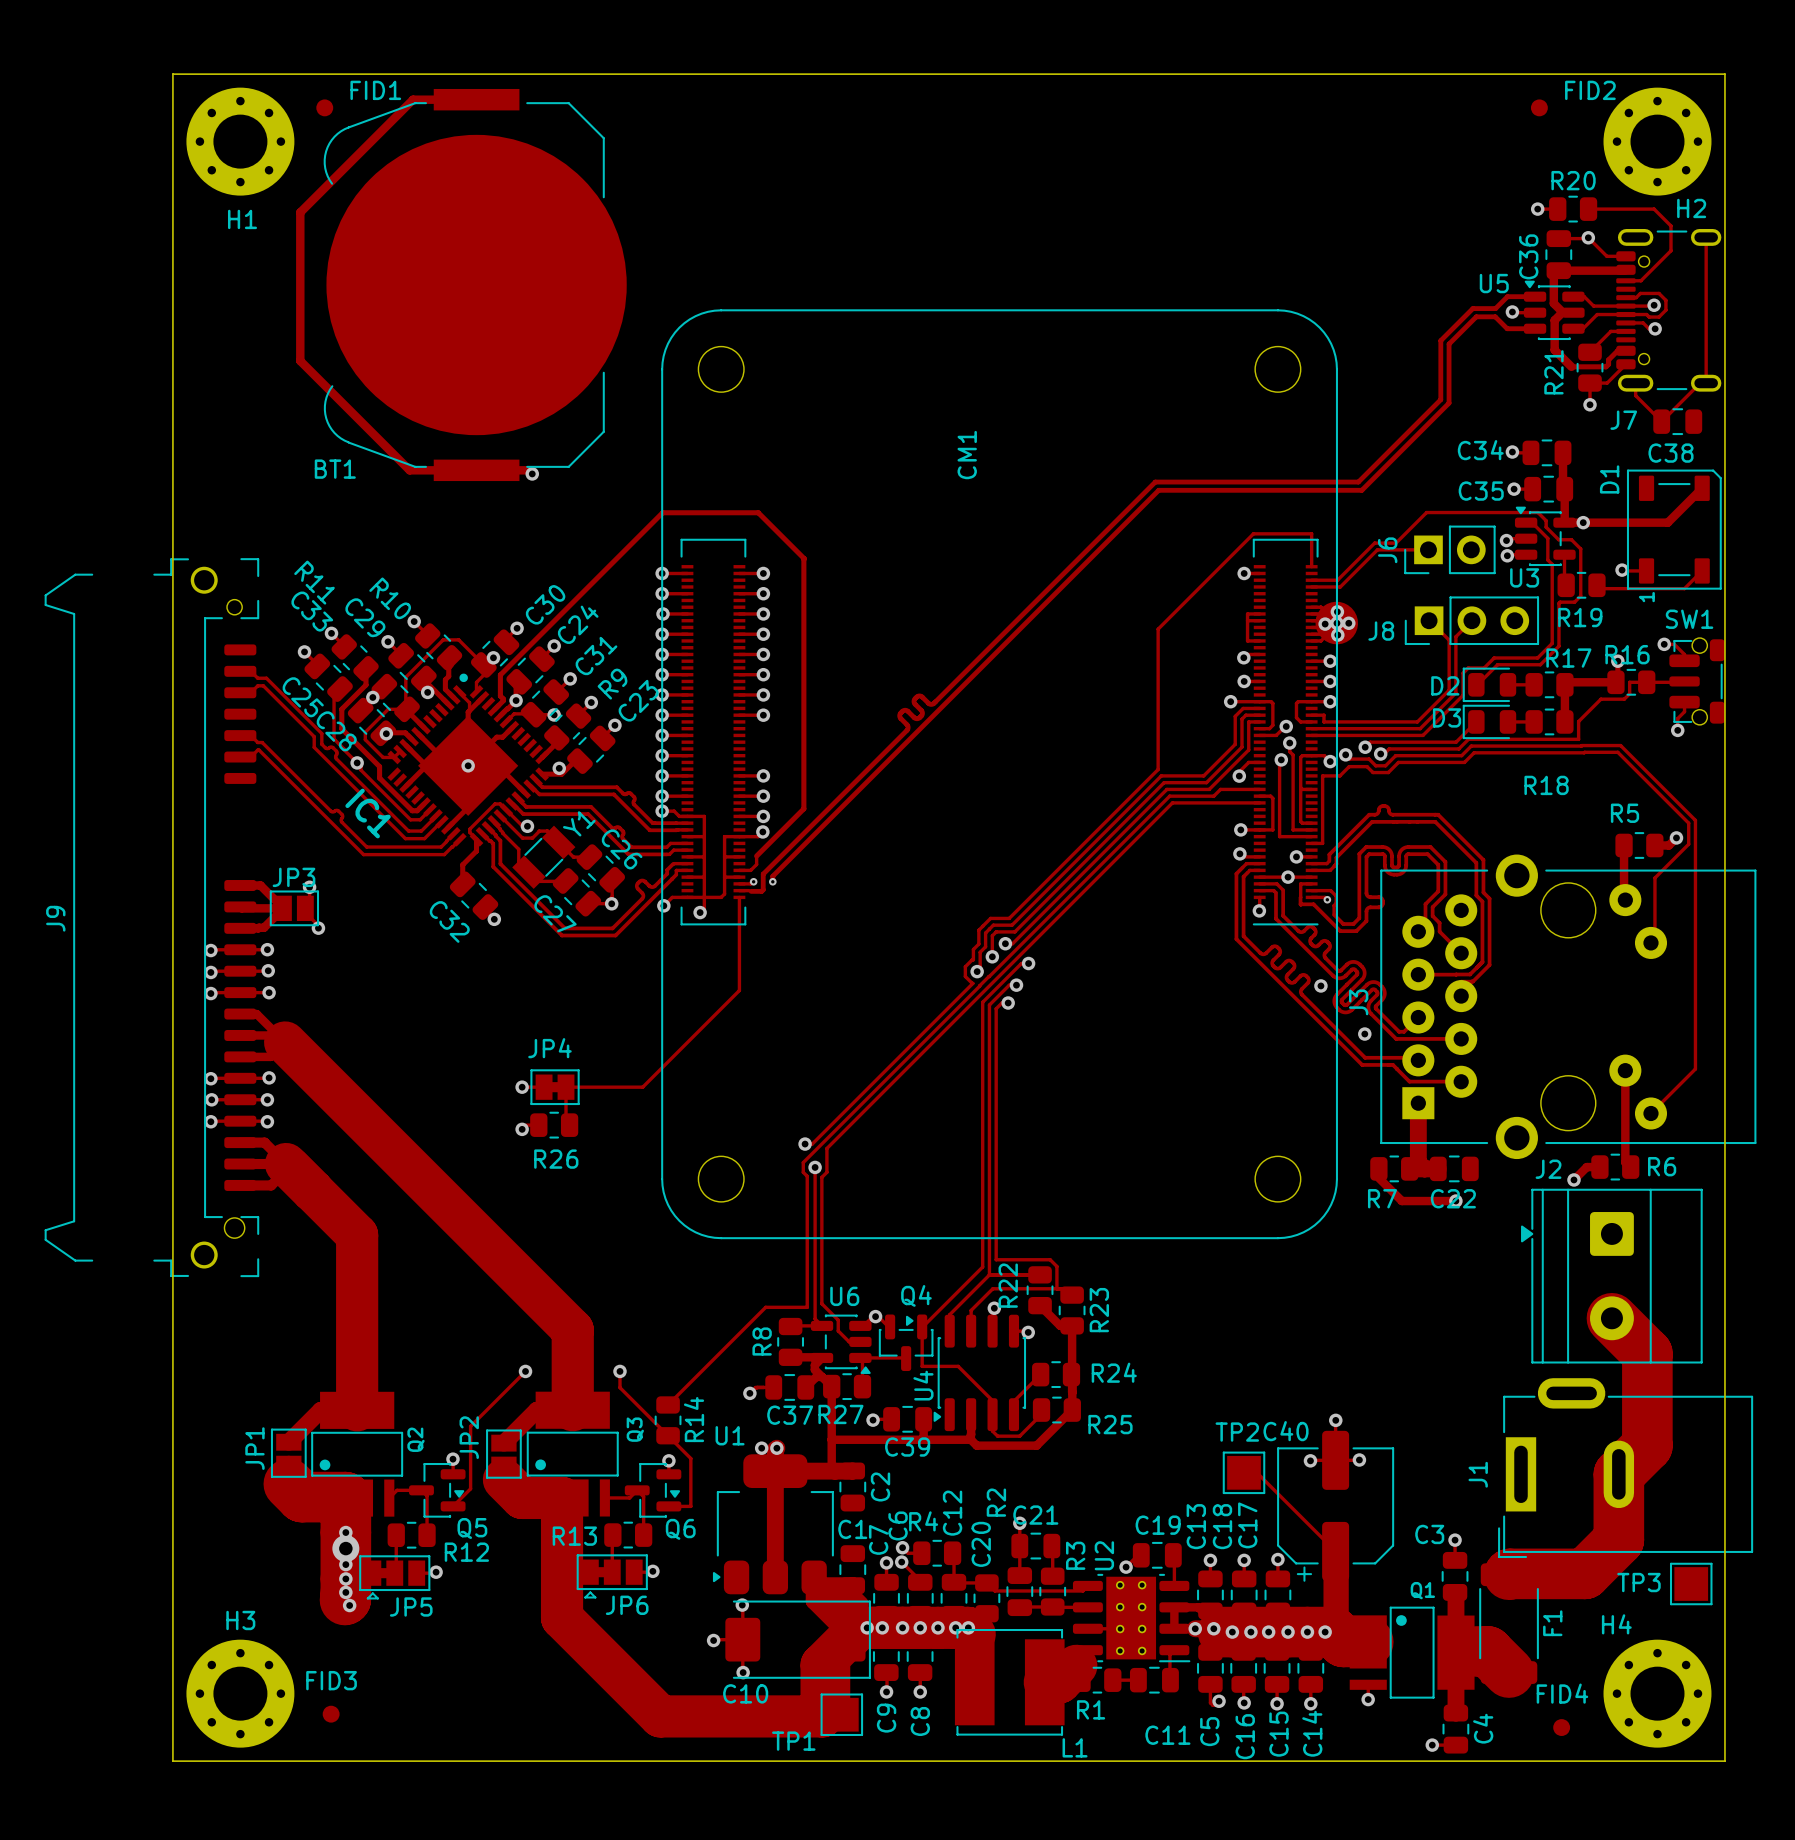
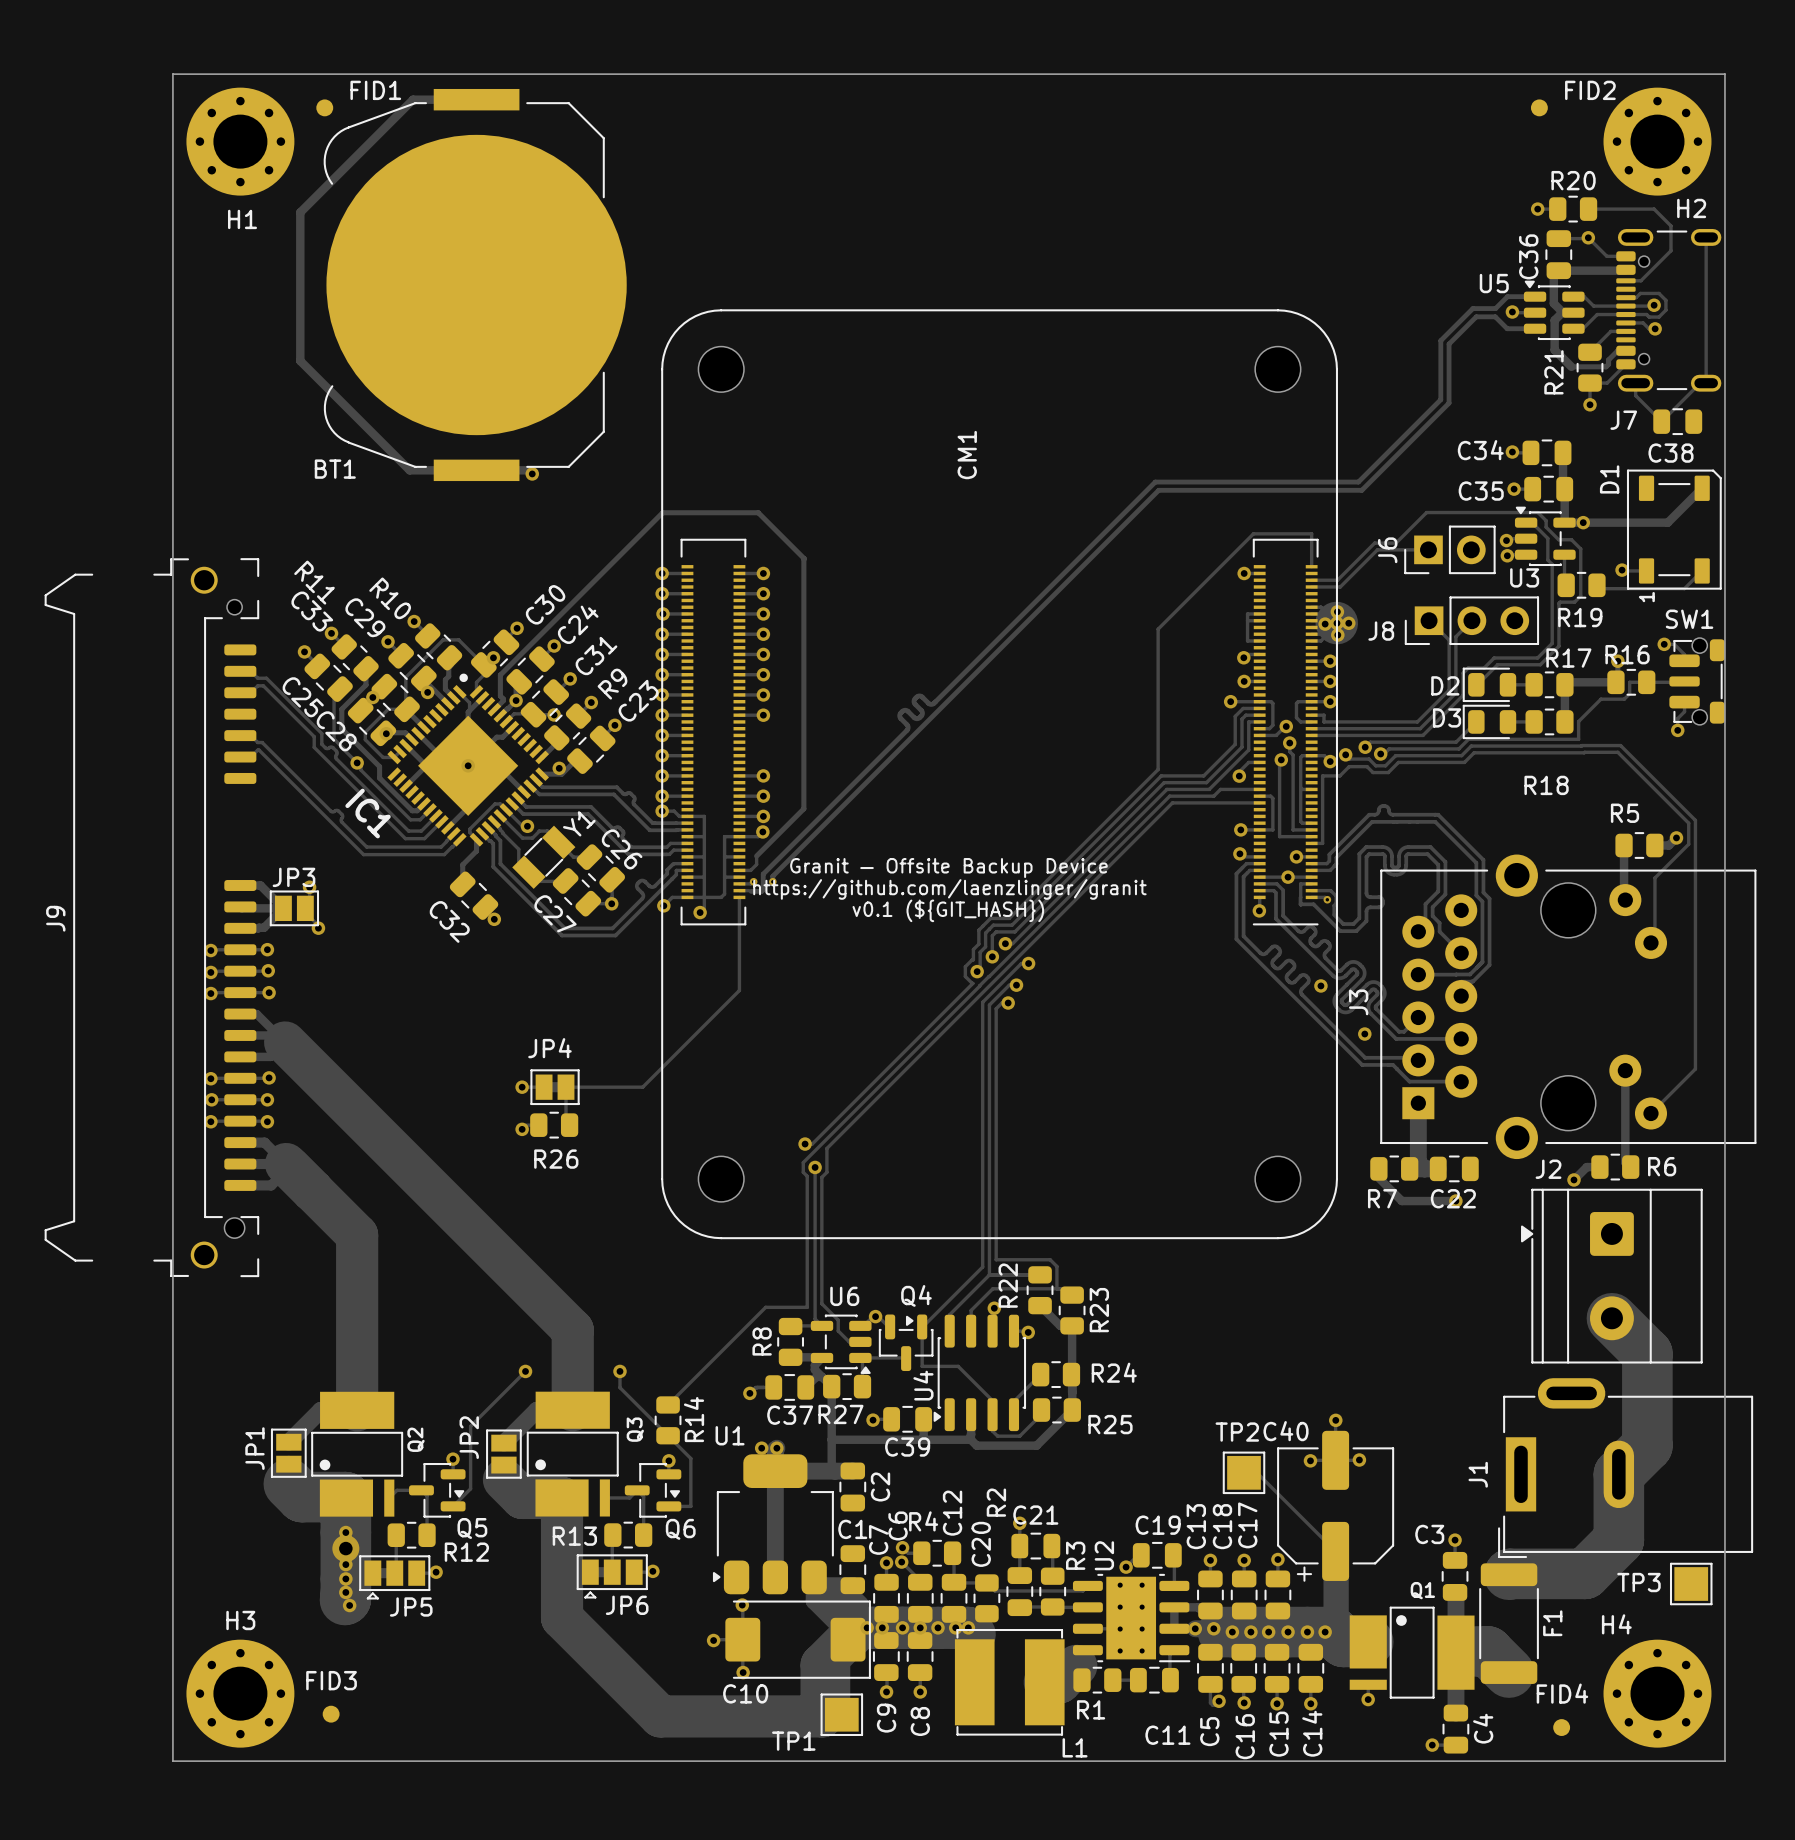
text: none -> Granit — Offsite Backup Device (948, 868)
text: none -> https://github.com/laenzlinger/granit (949, 889)
text: none -> v0.1 (${GIT_HASH}) (948, 910)

